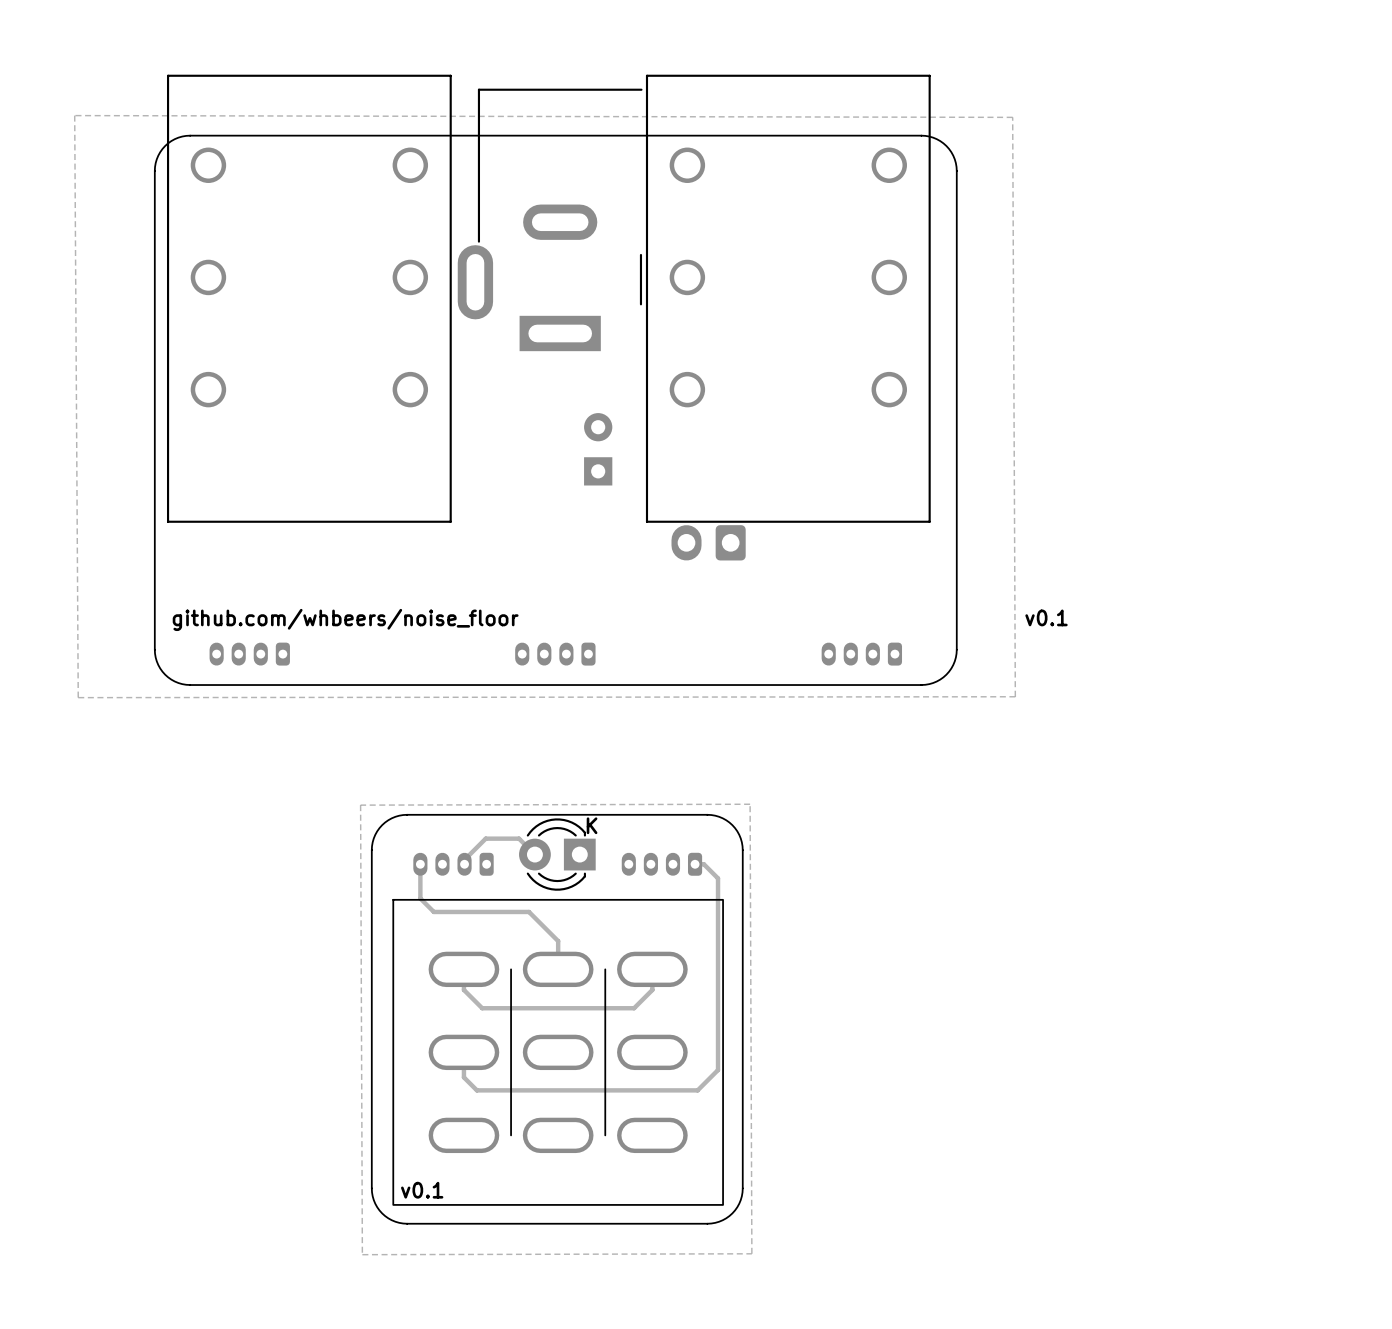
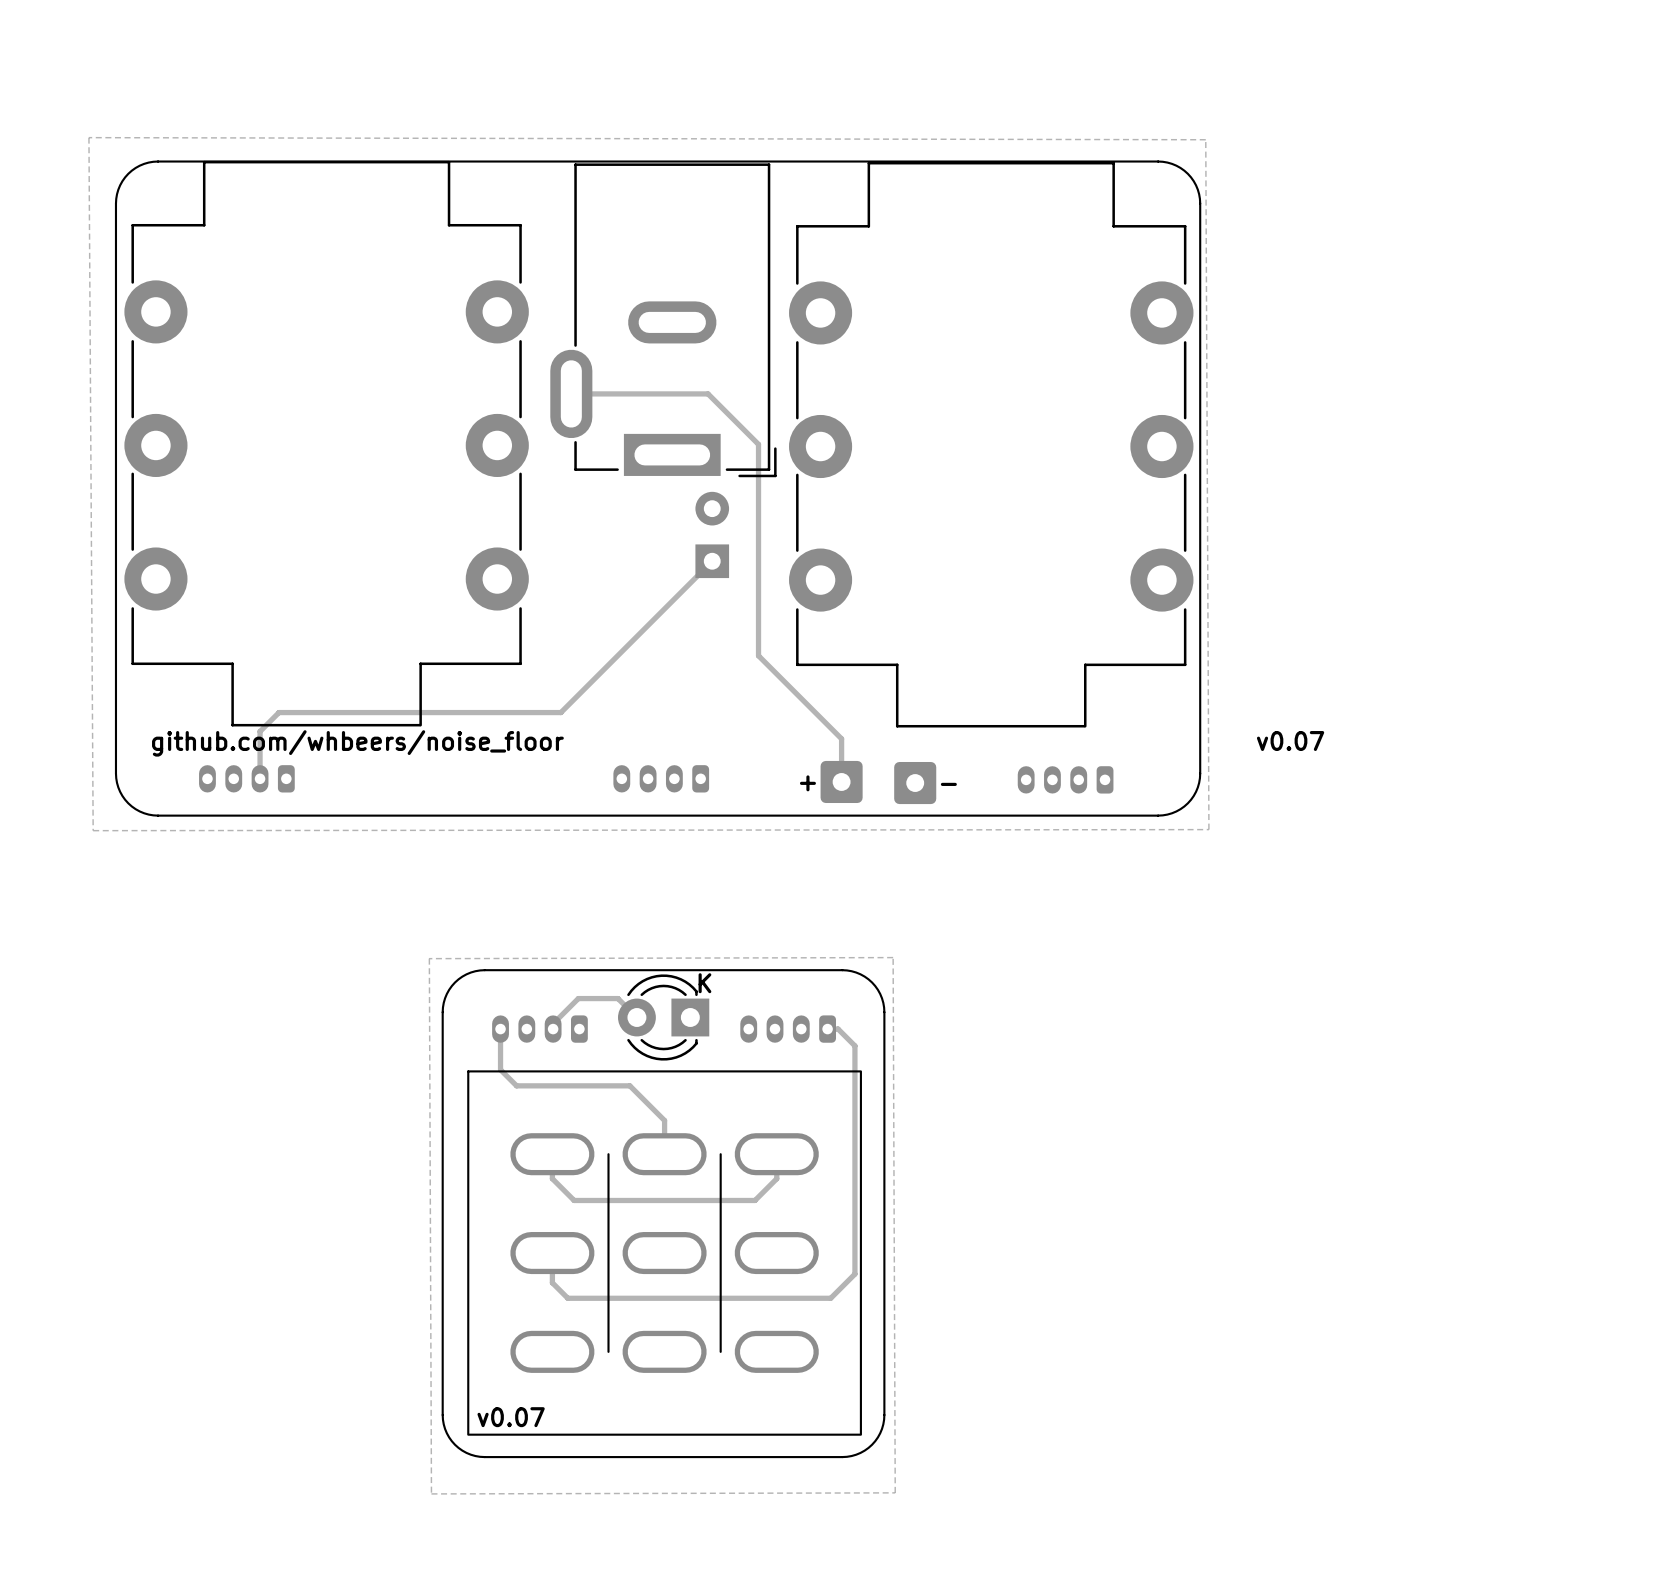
board edge: (190, 135) (174, 139) (165, 146) (158, 155) (154, 170) (155, 653) (158, 665) (165, 674) (174, 681) (190, 685) -> (226, 161) (158, 161) (144, 163) (131, 170) (125, 177) (118, 189) (115, 203) (117, 782) (125, 799) (131, 806) (144, 813) (158, 815) (226, 815)
board edge: (921, 135) (936, 139) (946, 146) (953, 155) (956, 170) (956, 653) (951, 668) (943, 677) (933, 683) (921, 685) -> (1097, 161) (1158, 161) (1172, 163) (1184, 170) (1191, 177) (1197, 189) (1200, 203) (1199, 778) (1196, 791) (1191, 799) (1184, 806) (1172, 813) (1158, 815) (1097, 815)
part: (550, 219) -> none
part: none -> (663, 320)
part: (309, 298) -> none
part: (788, 298) -> none
track: none -> (571, 393) (708, 393) (758, 444) (758, 655) (841, 738) (841, 781)
part: none -> (326, 443)
part: none -> (991, 444)
track: none -> (712, 561) (560, 712) (278, 712) (260, 731) (260, 778)
part: (708, 542) -> none
text: github.com/whbeers/noise_floor v0.1 (620, 619) -> github.com/whbeers/noise_floor v0.07 (738, 743)
part position: (249, 654) -> (246, 778)
part position: (861, 654) -> (1065, 779)
part: none -> (841, 781)
part: none -> (915, 783)
text: v0.1 (422, 1190) -> v0.07 (511, 1417)

